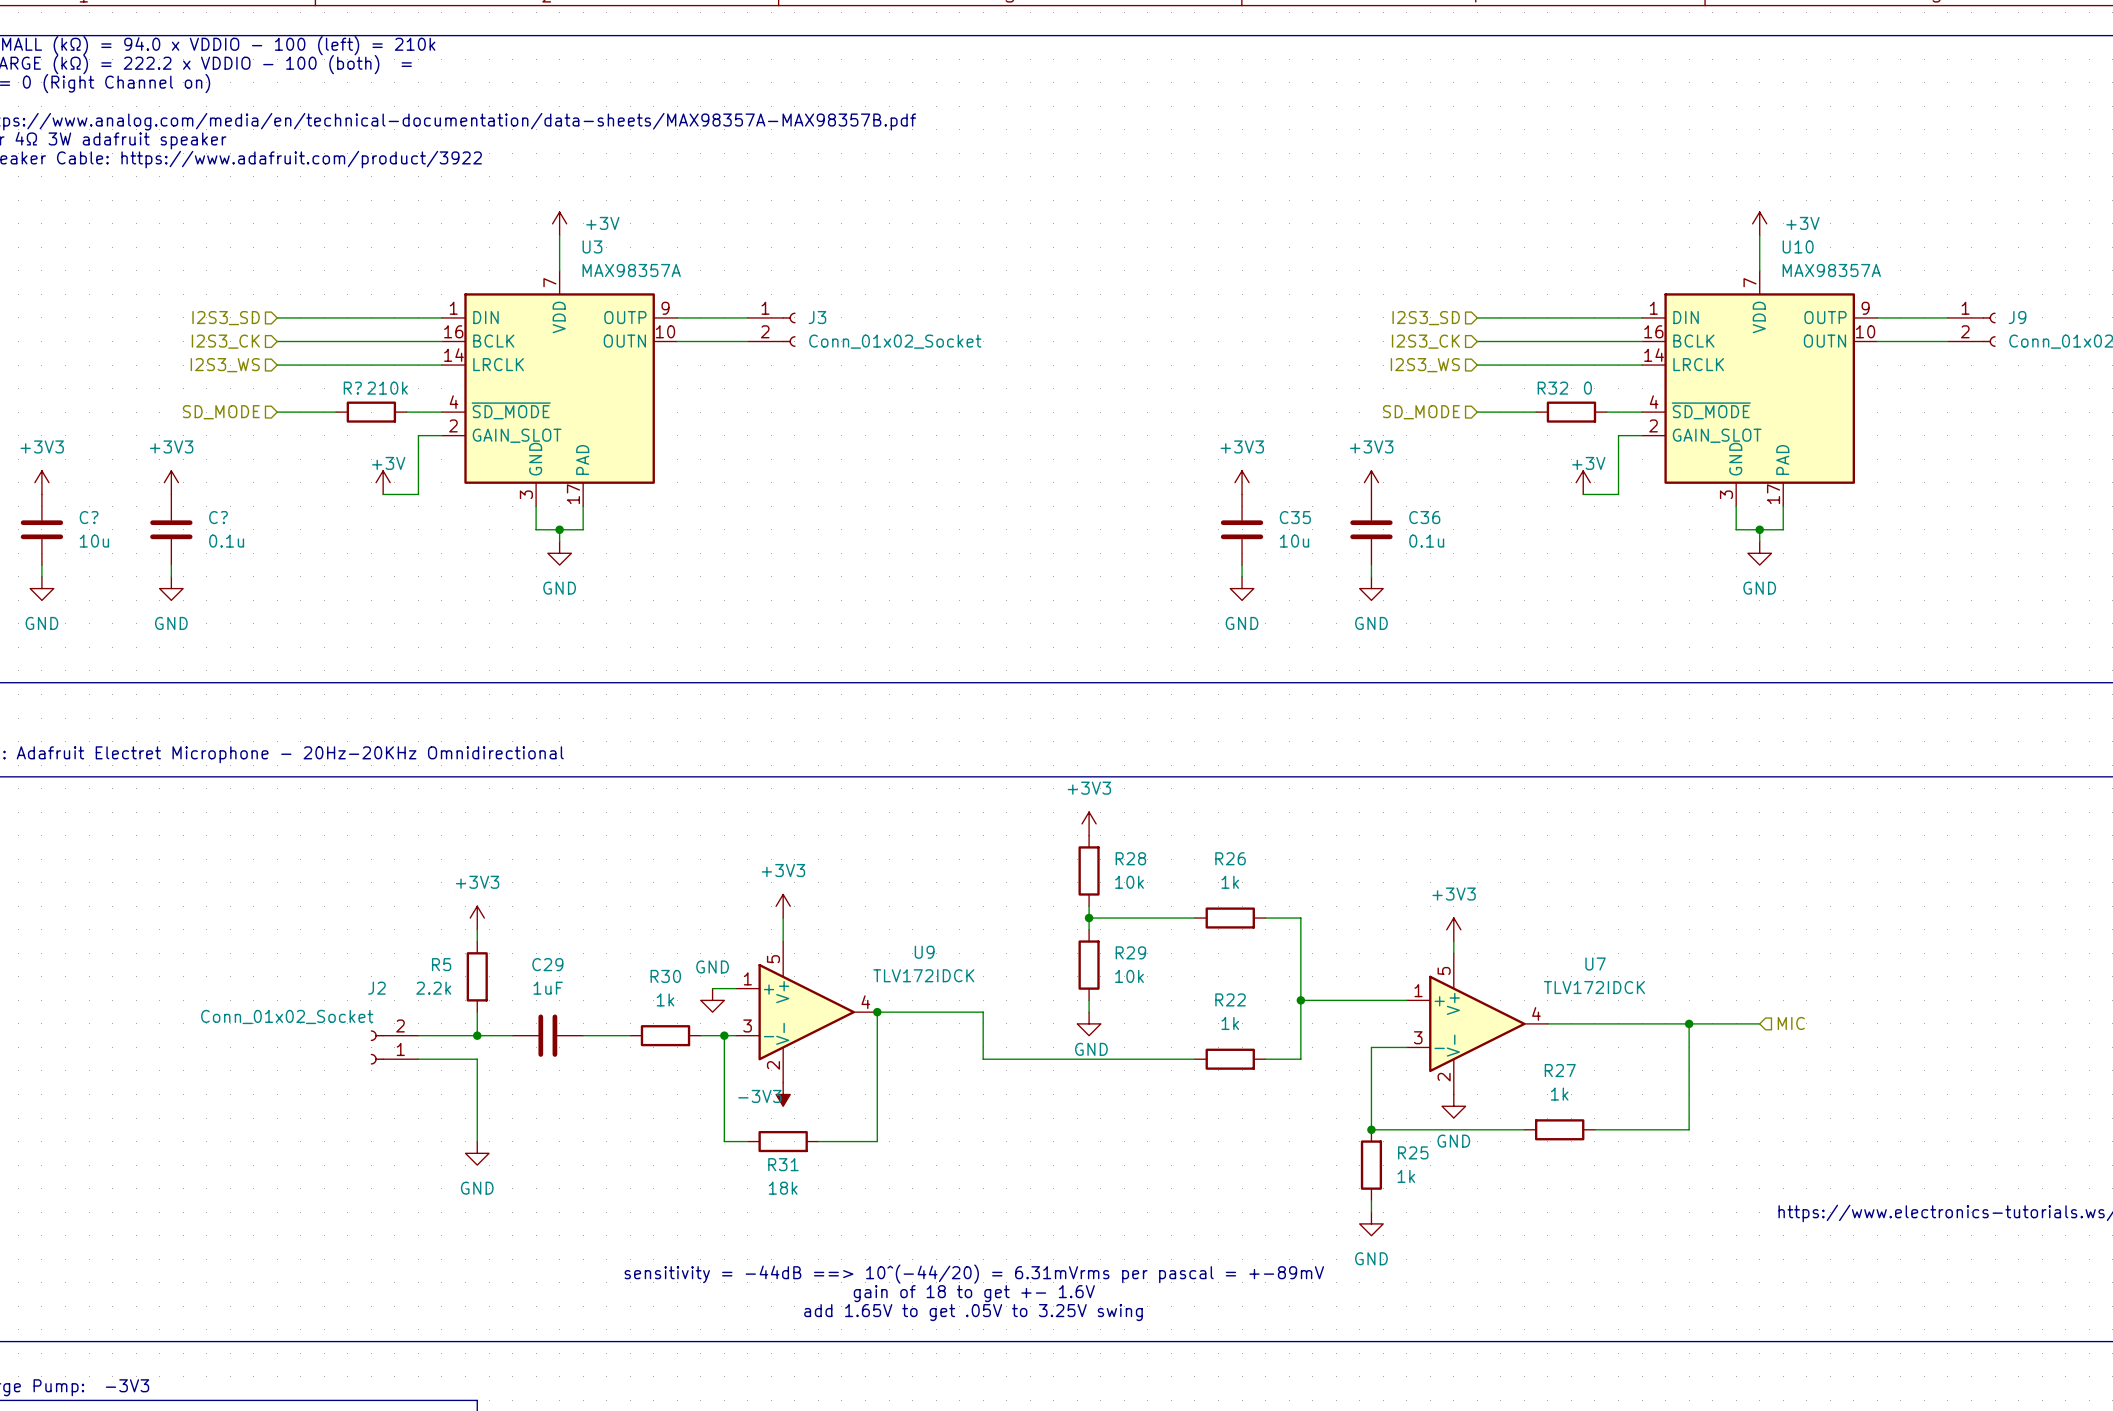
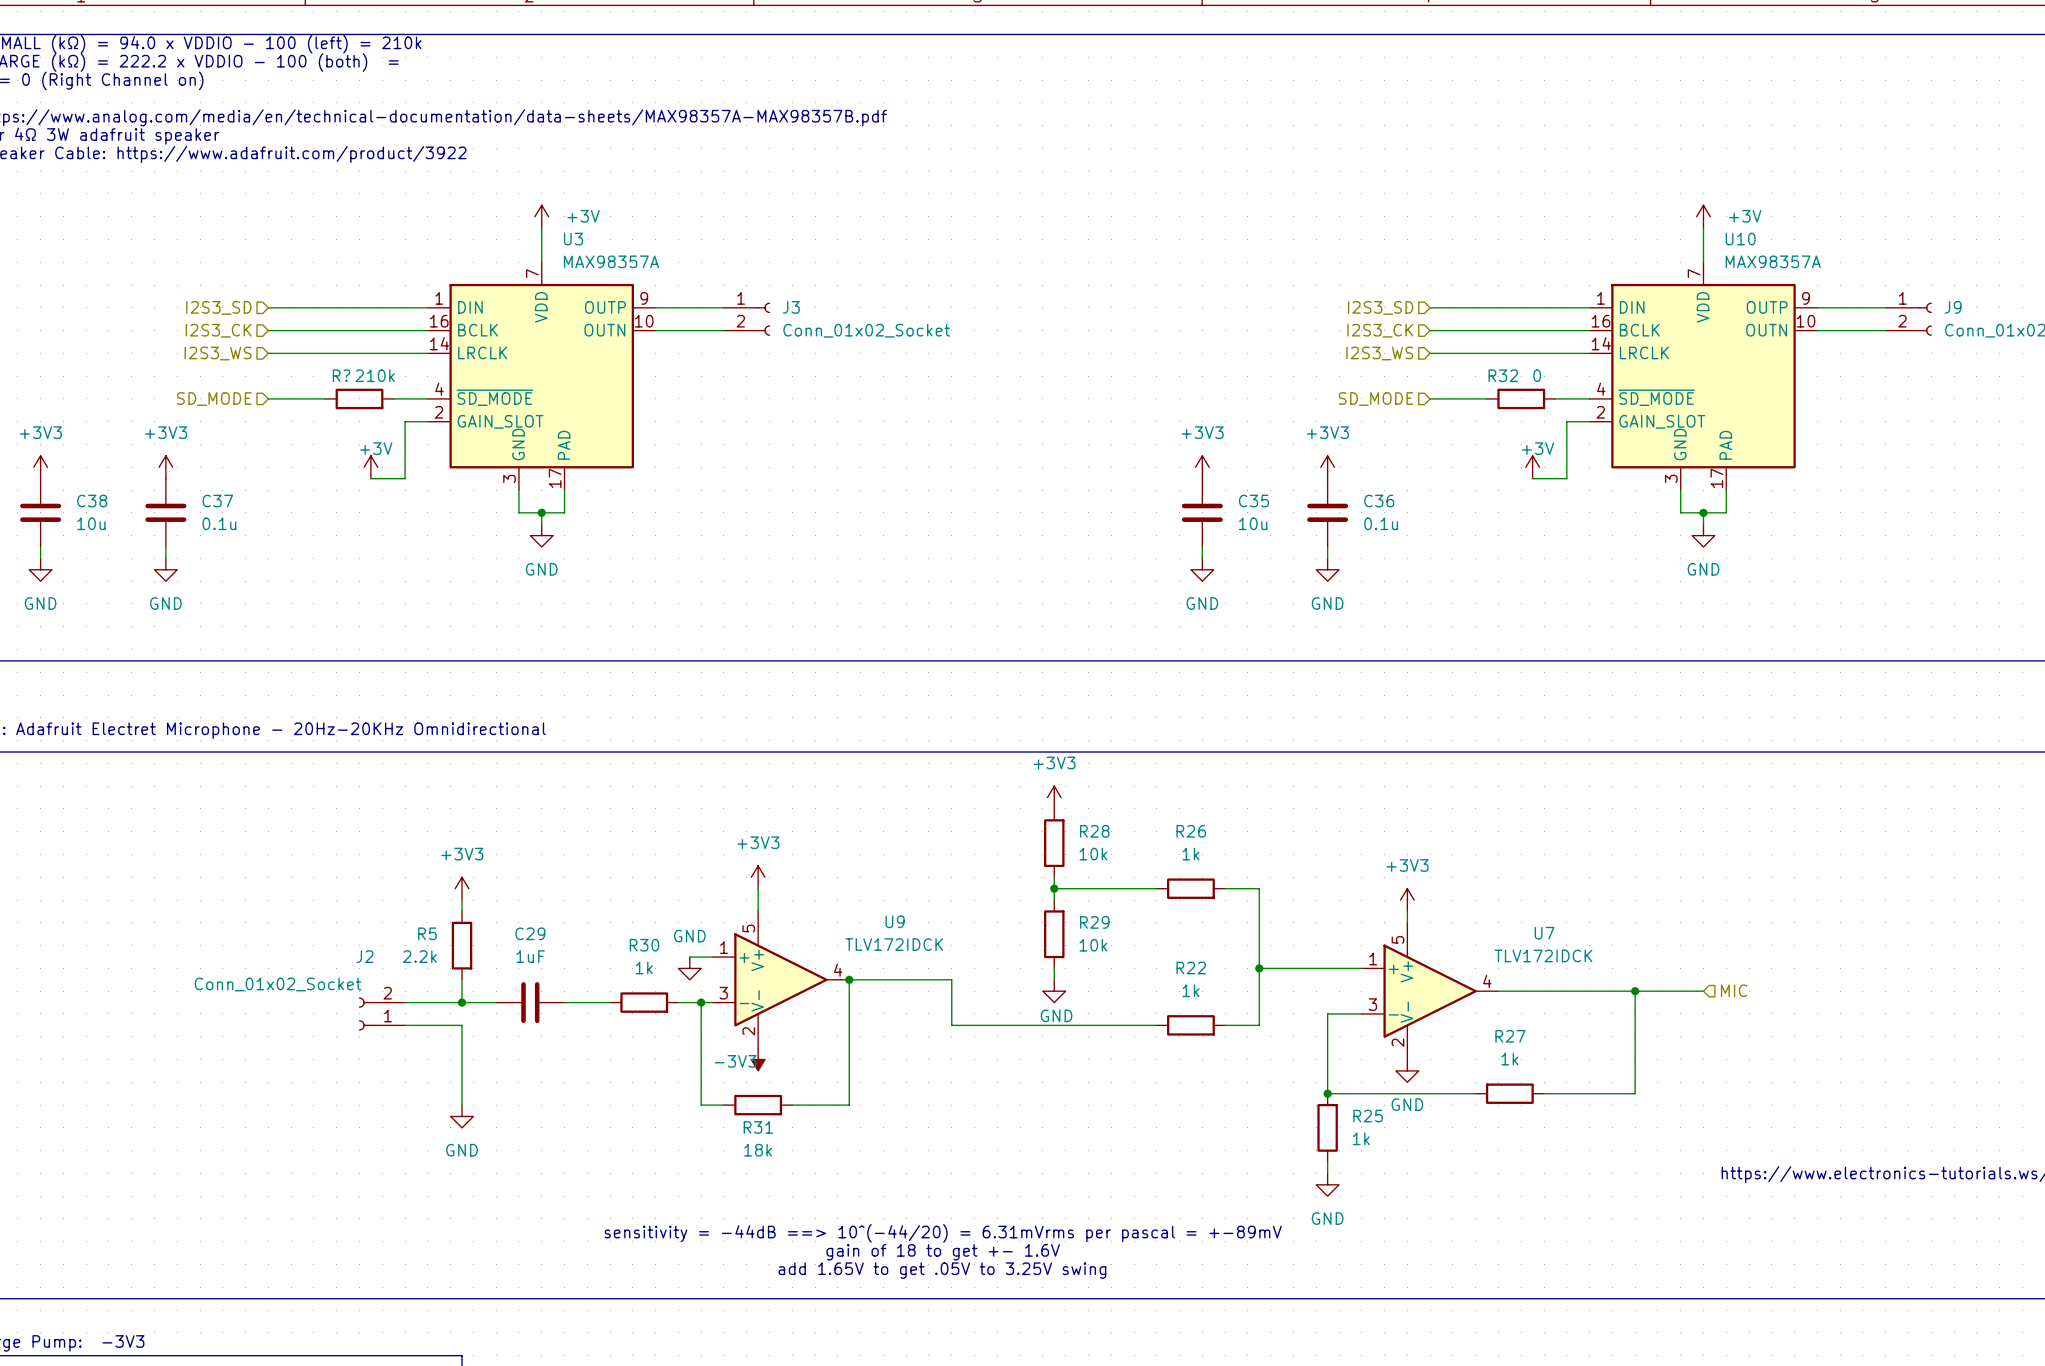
C? name: C? (89, 517) -> C38 (92, 501)
C? name: C? (218, 517) -> C37 (217, 501)

